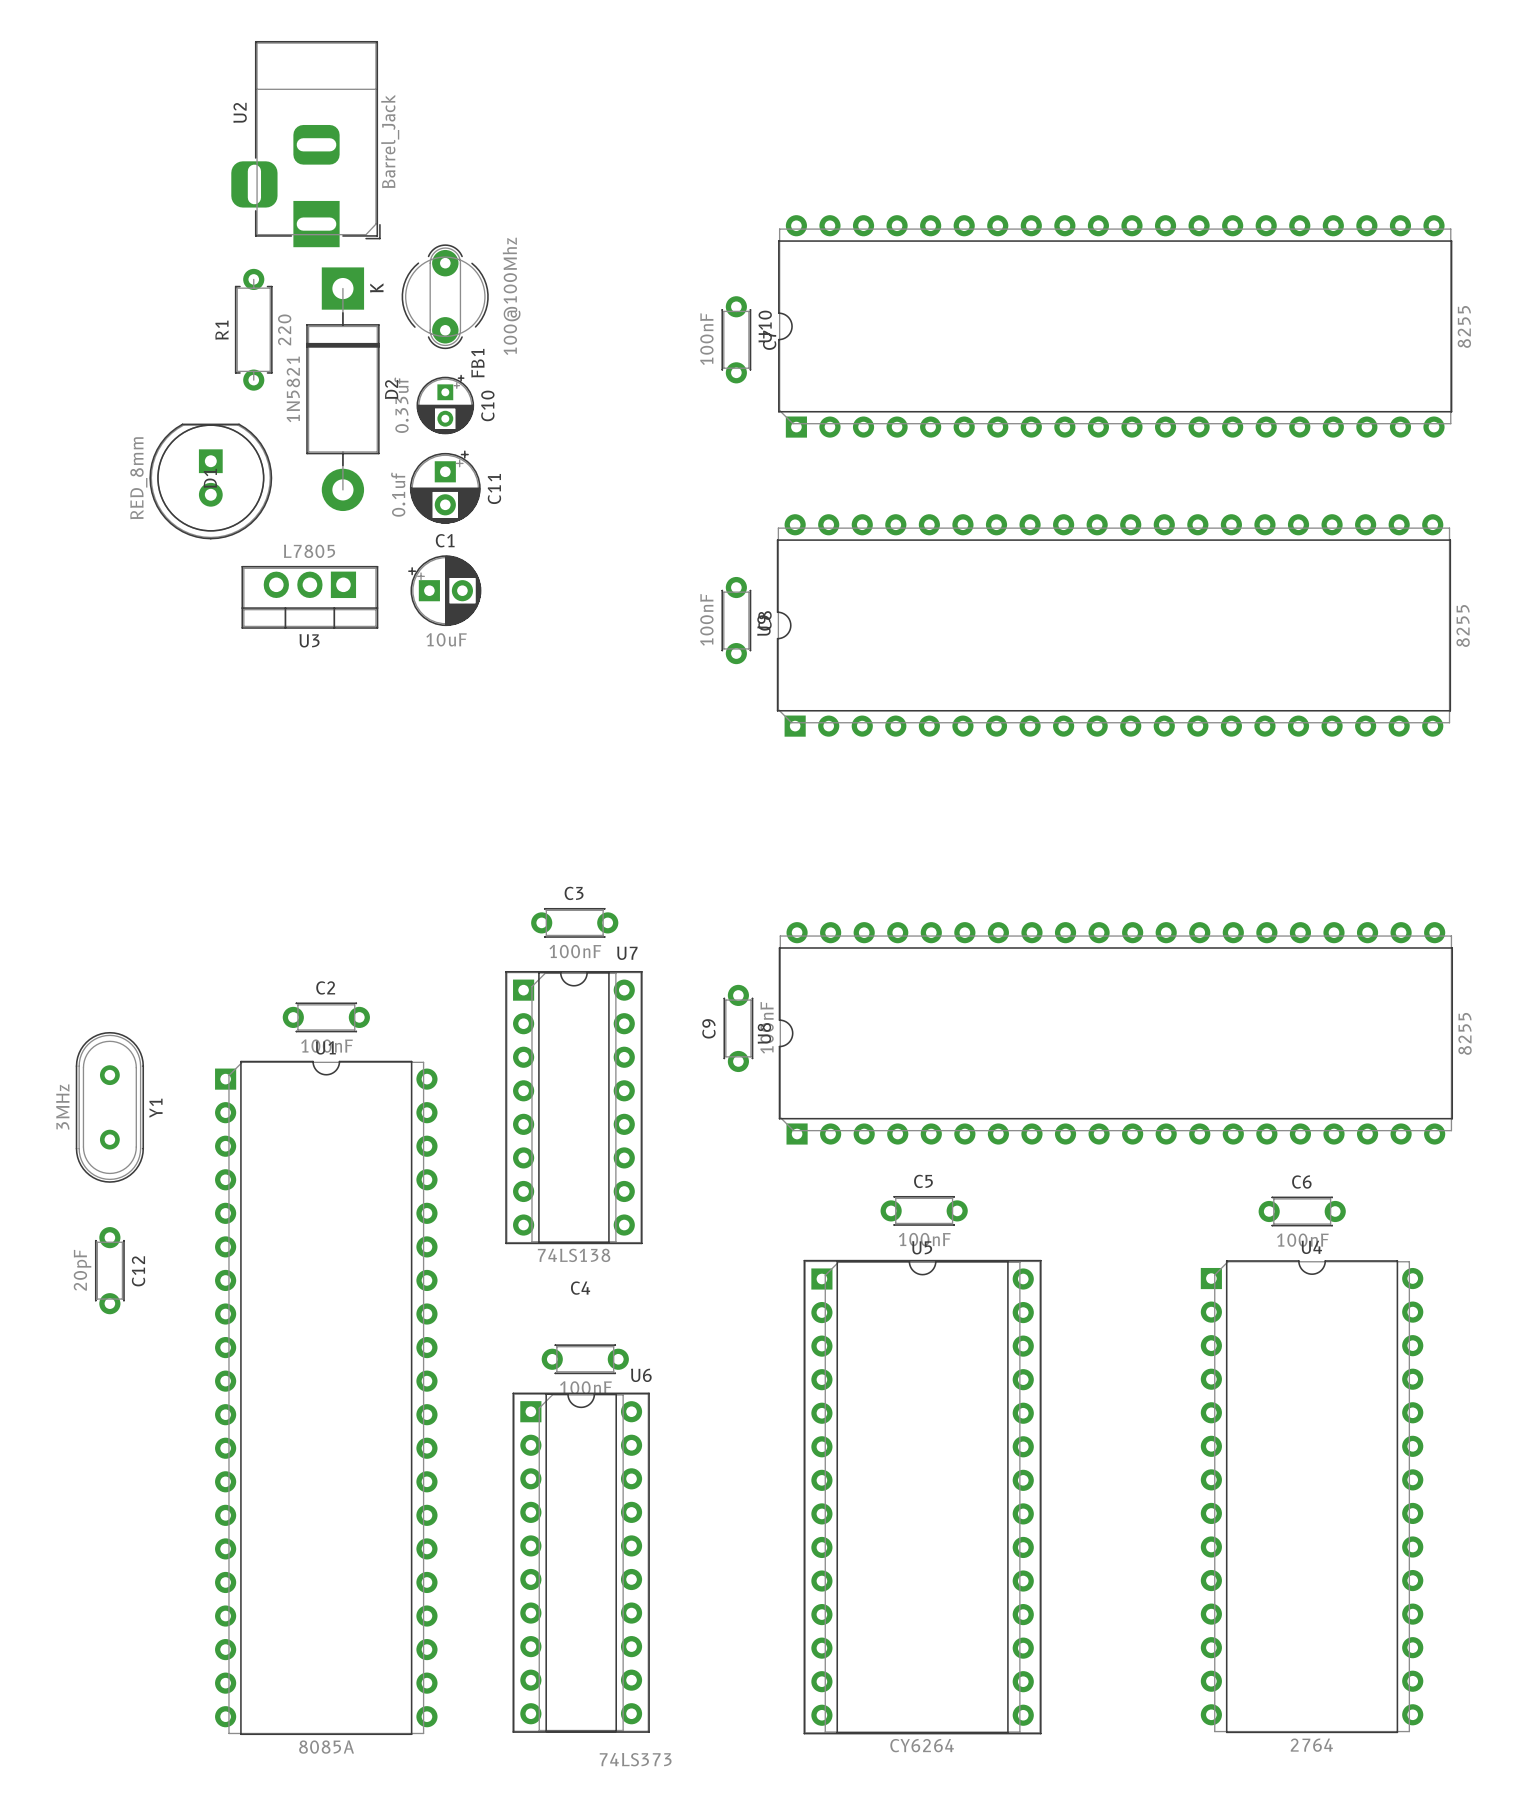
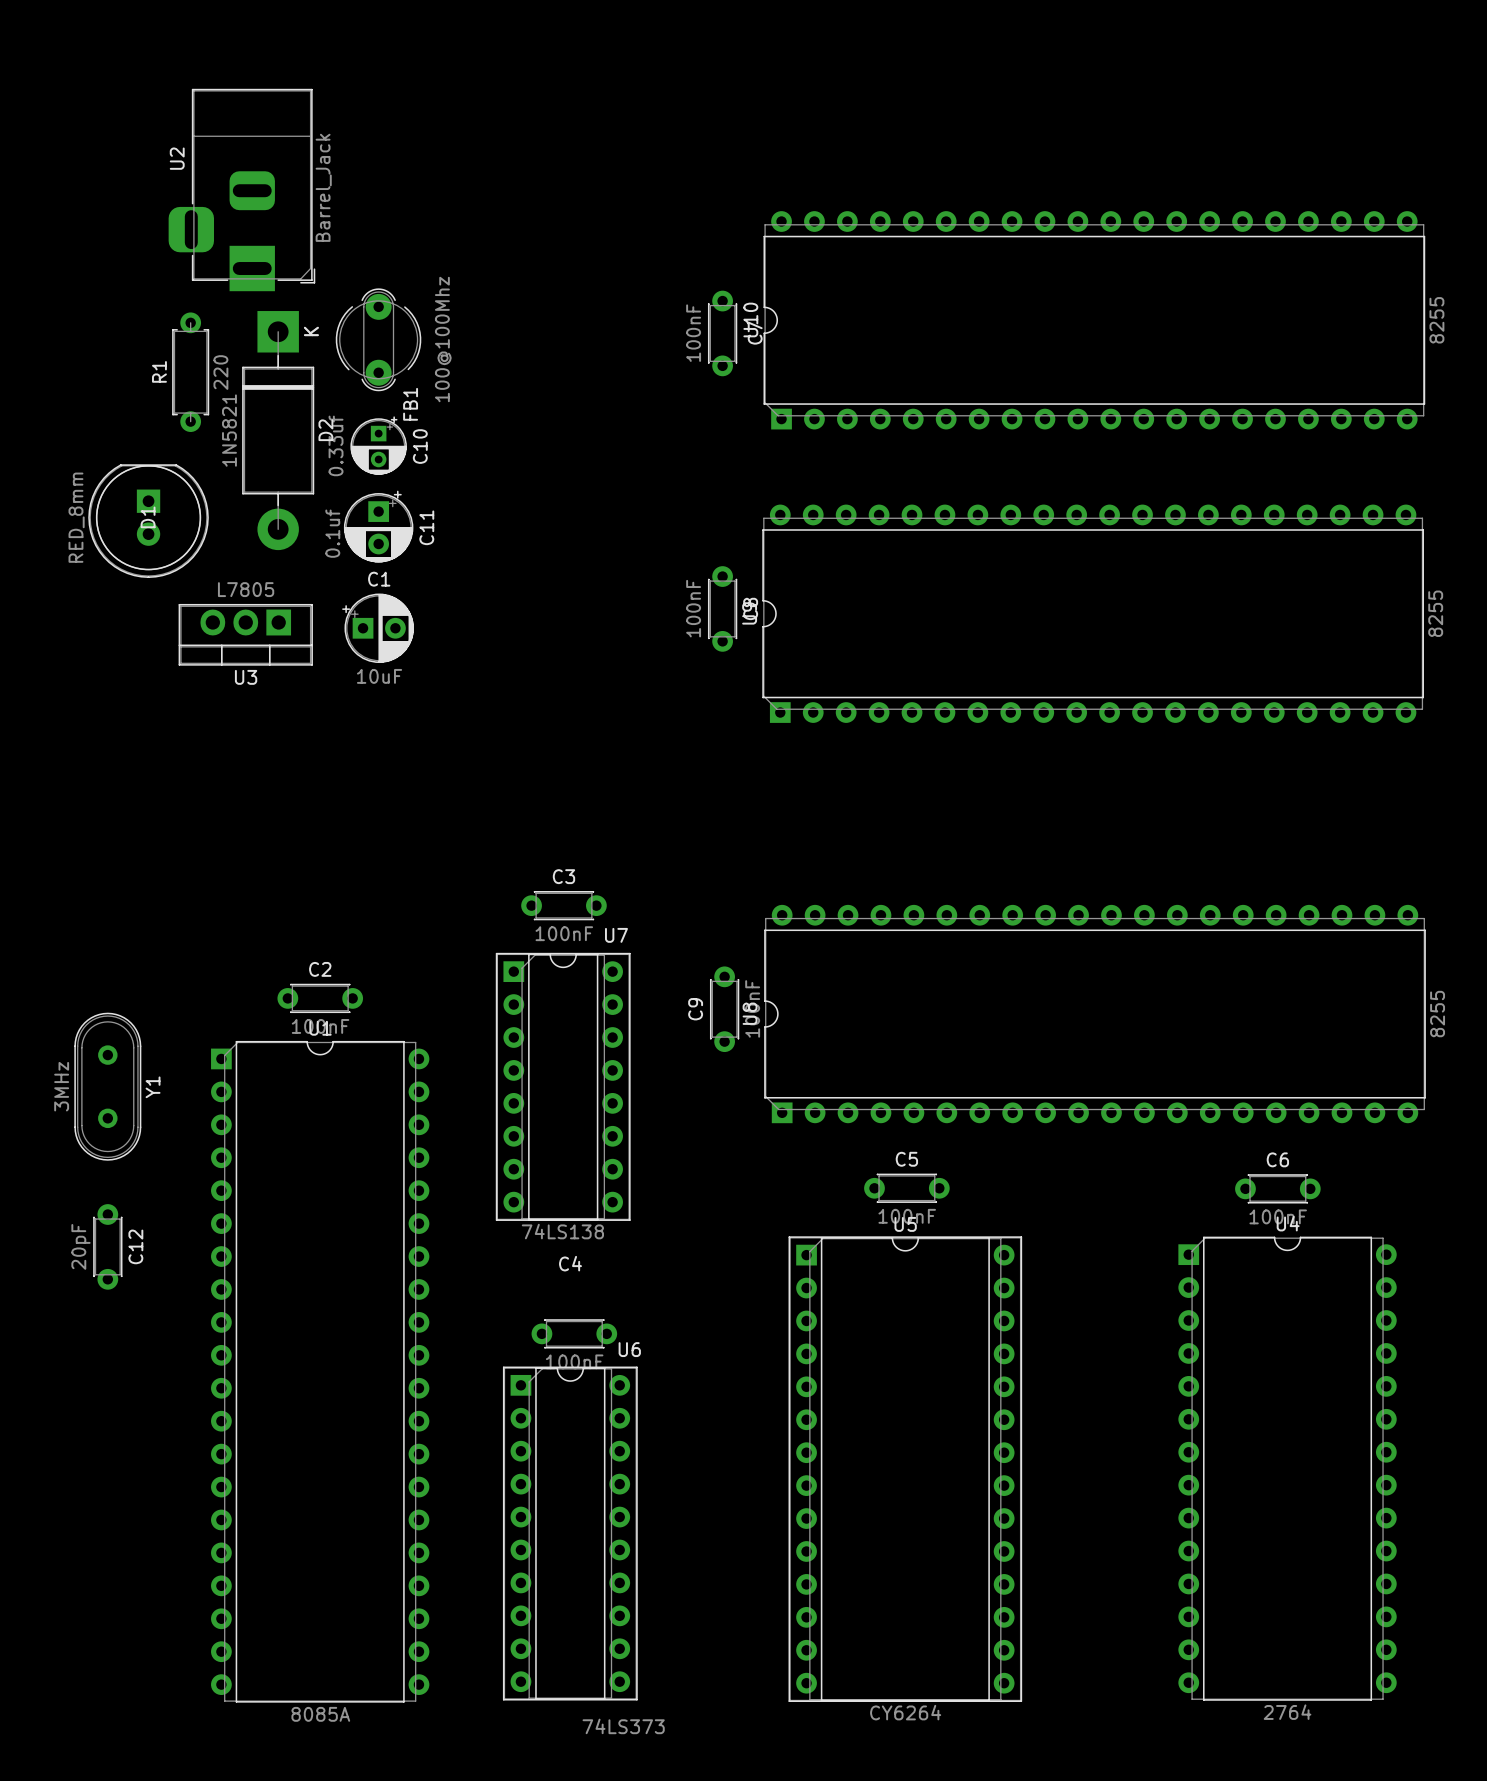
U2 position: (306, 144) -> (241, 190)
FB1 position: (445, 296) -> (378, 339)
R1 position: (253, 329) -> (190, 372)
D2 position: (342, 389) -> (278, 430)
C10 position: (445, 404) -> (378, 445)
D1 position: (210, 481) -> (148, 521)
C11 position: (445, 487) -> (378, 526)
C1 position: (444, 590) -> (378, 628)
U3 position: (309, 597) -> (245, 634)

